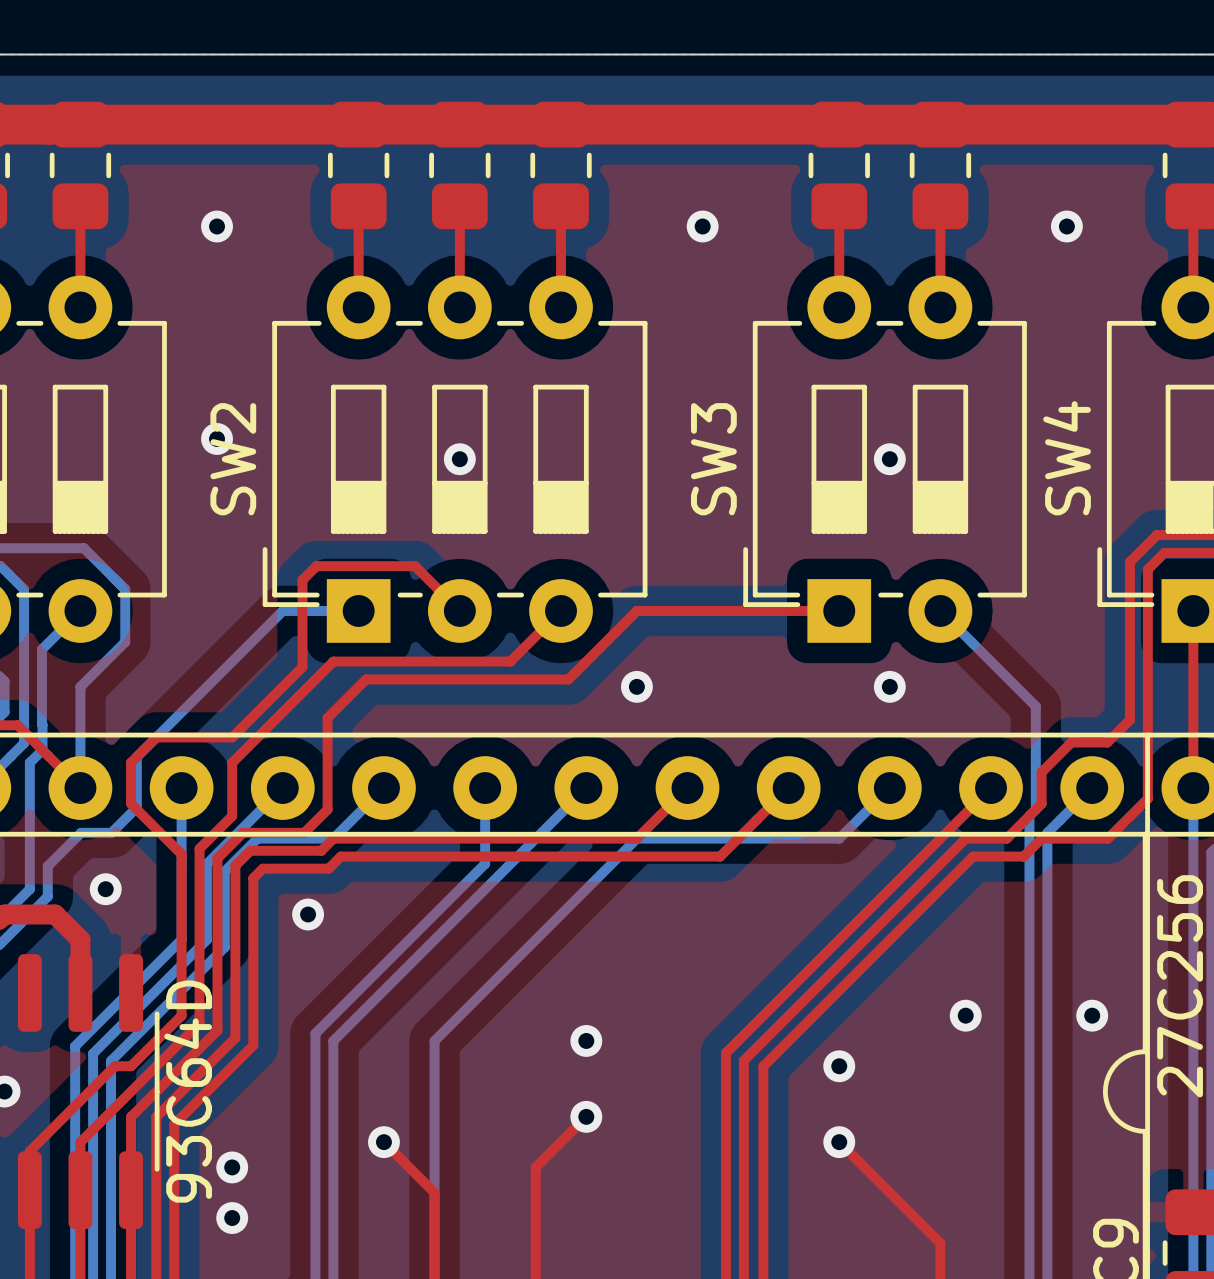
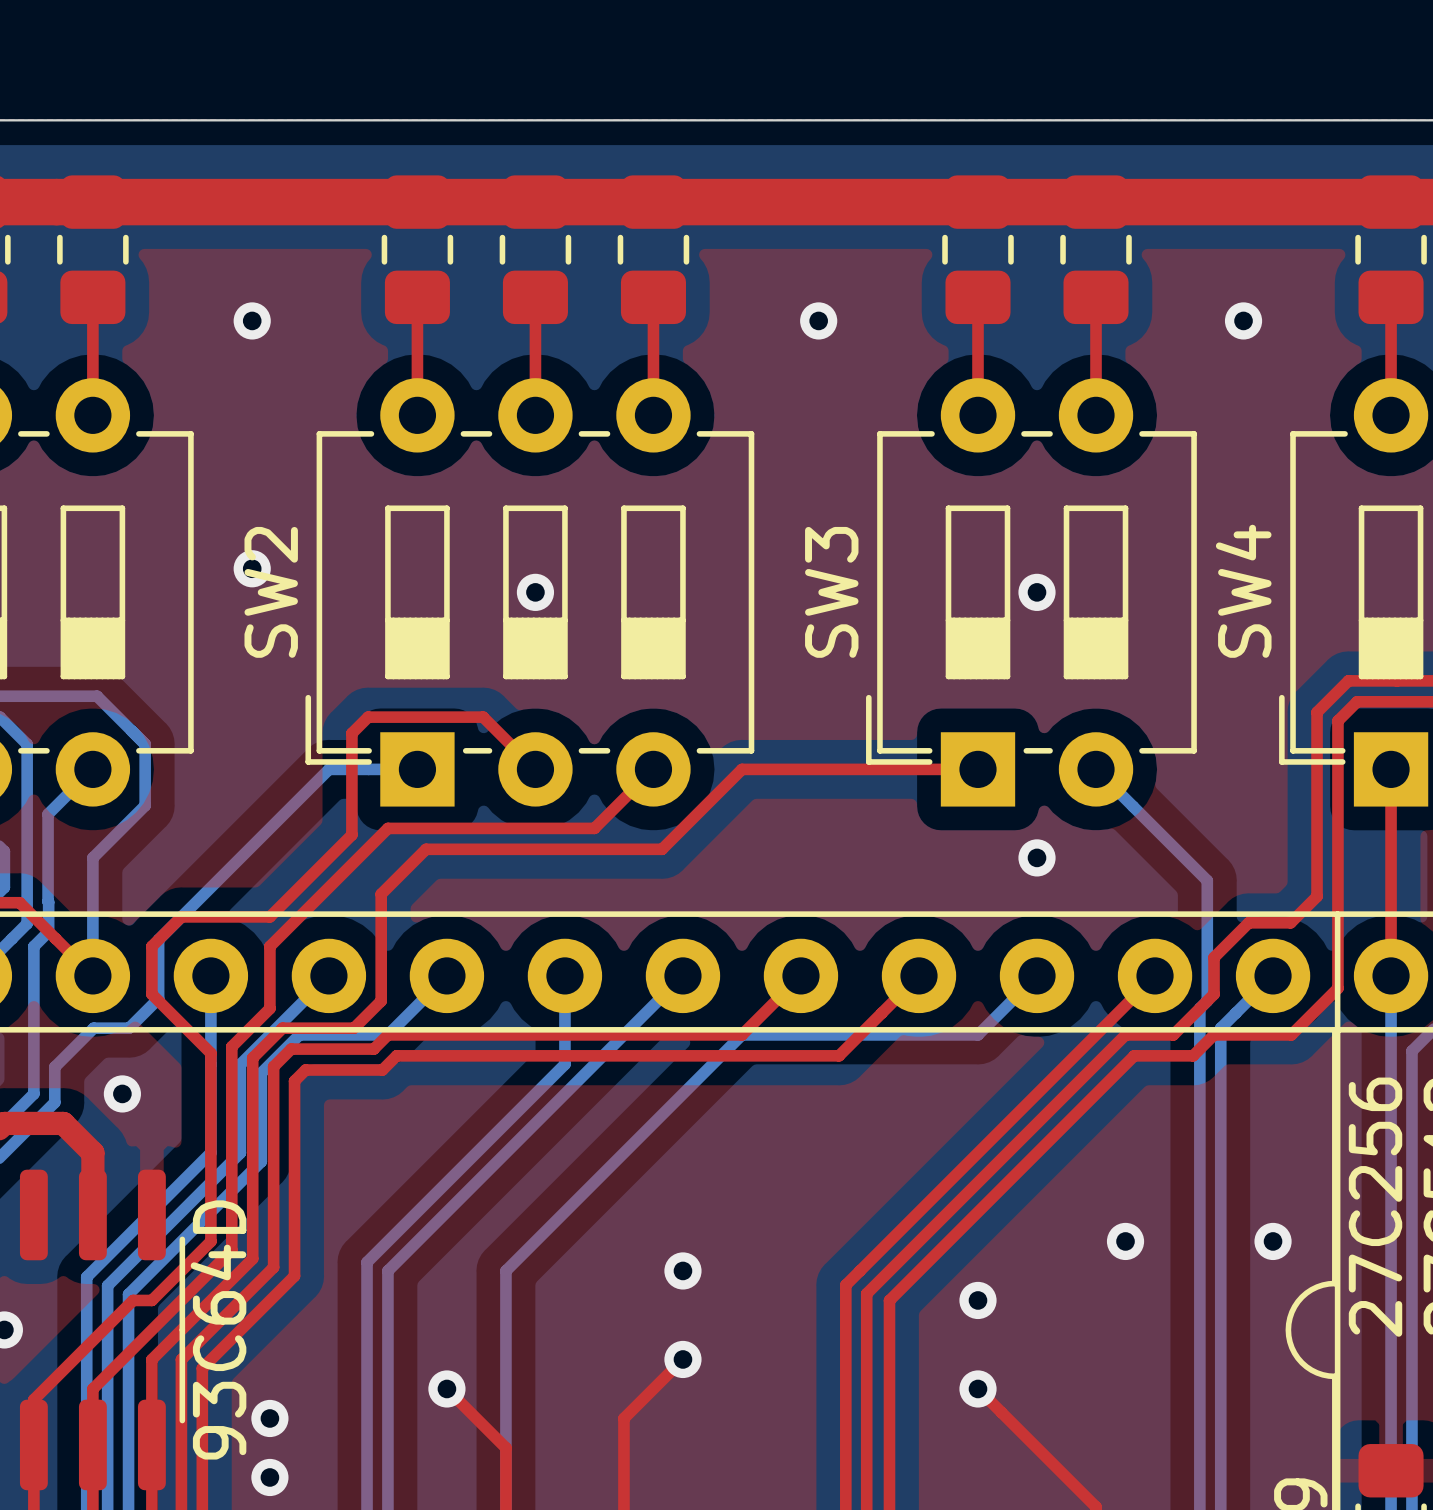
via: (636, 686) -> none
via: (308, 914) -> none

